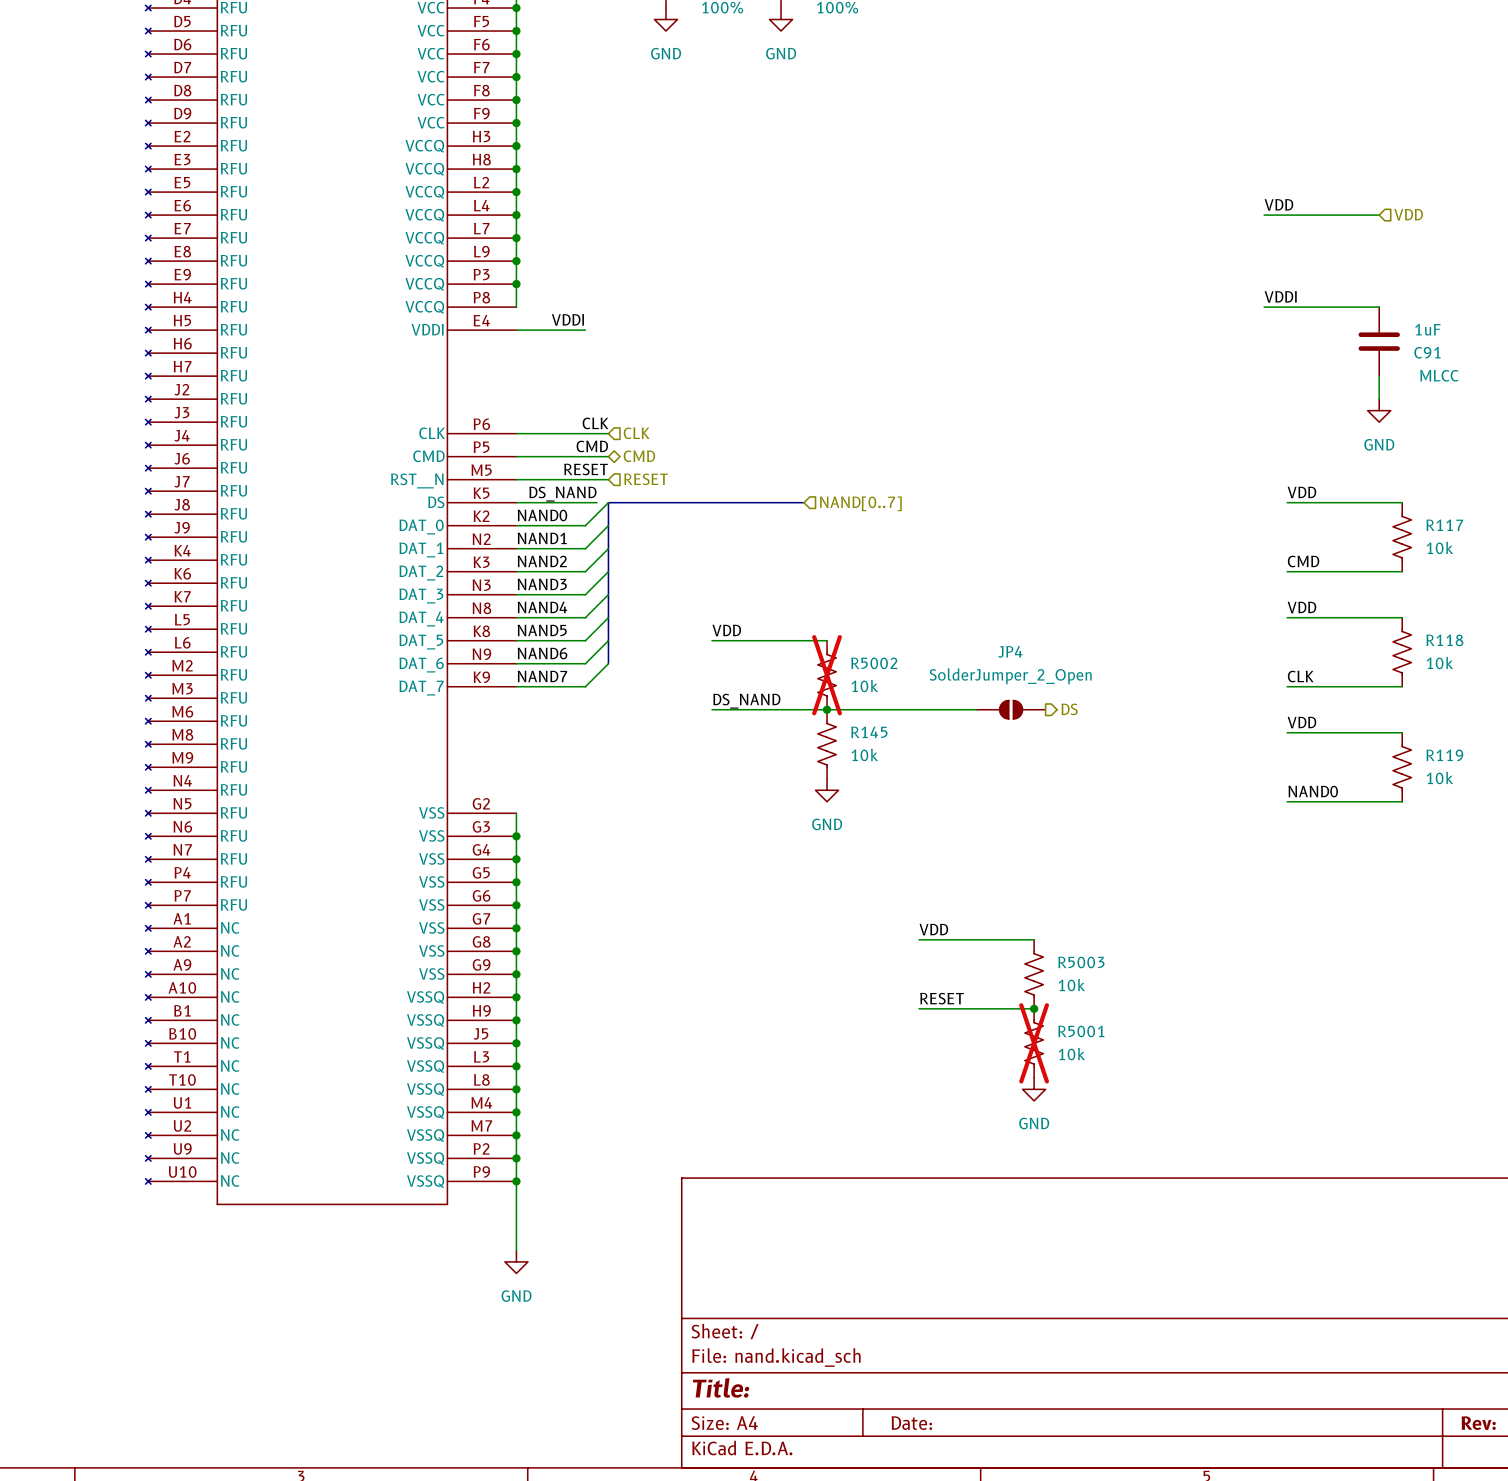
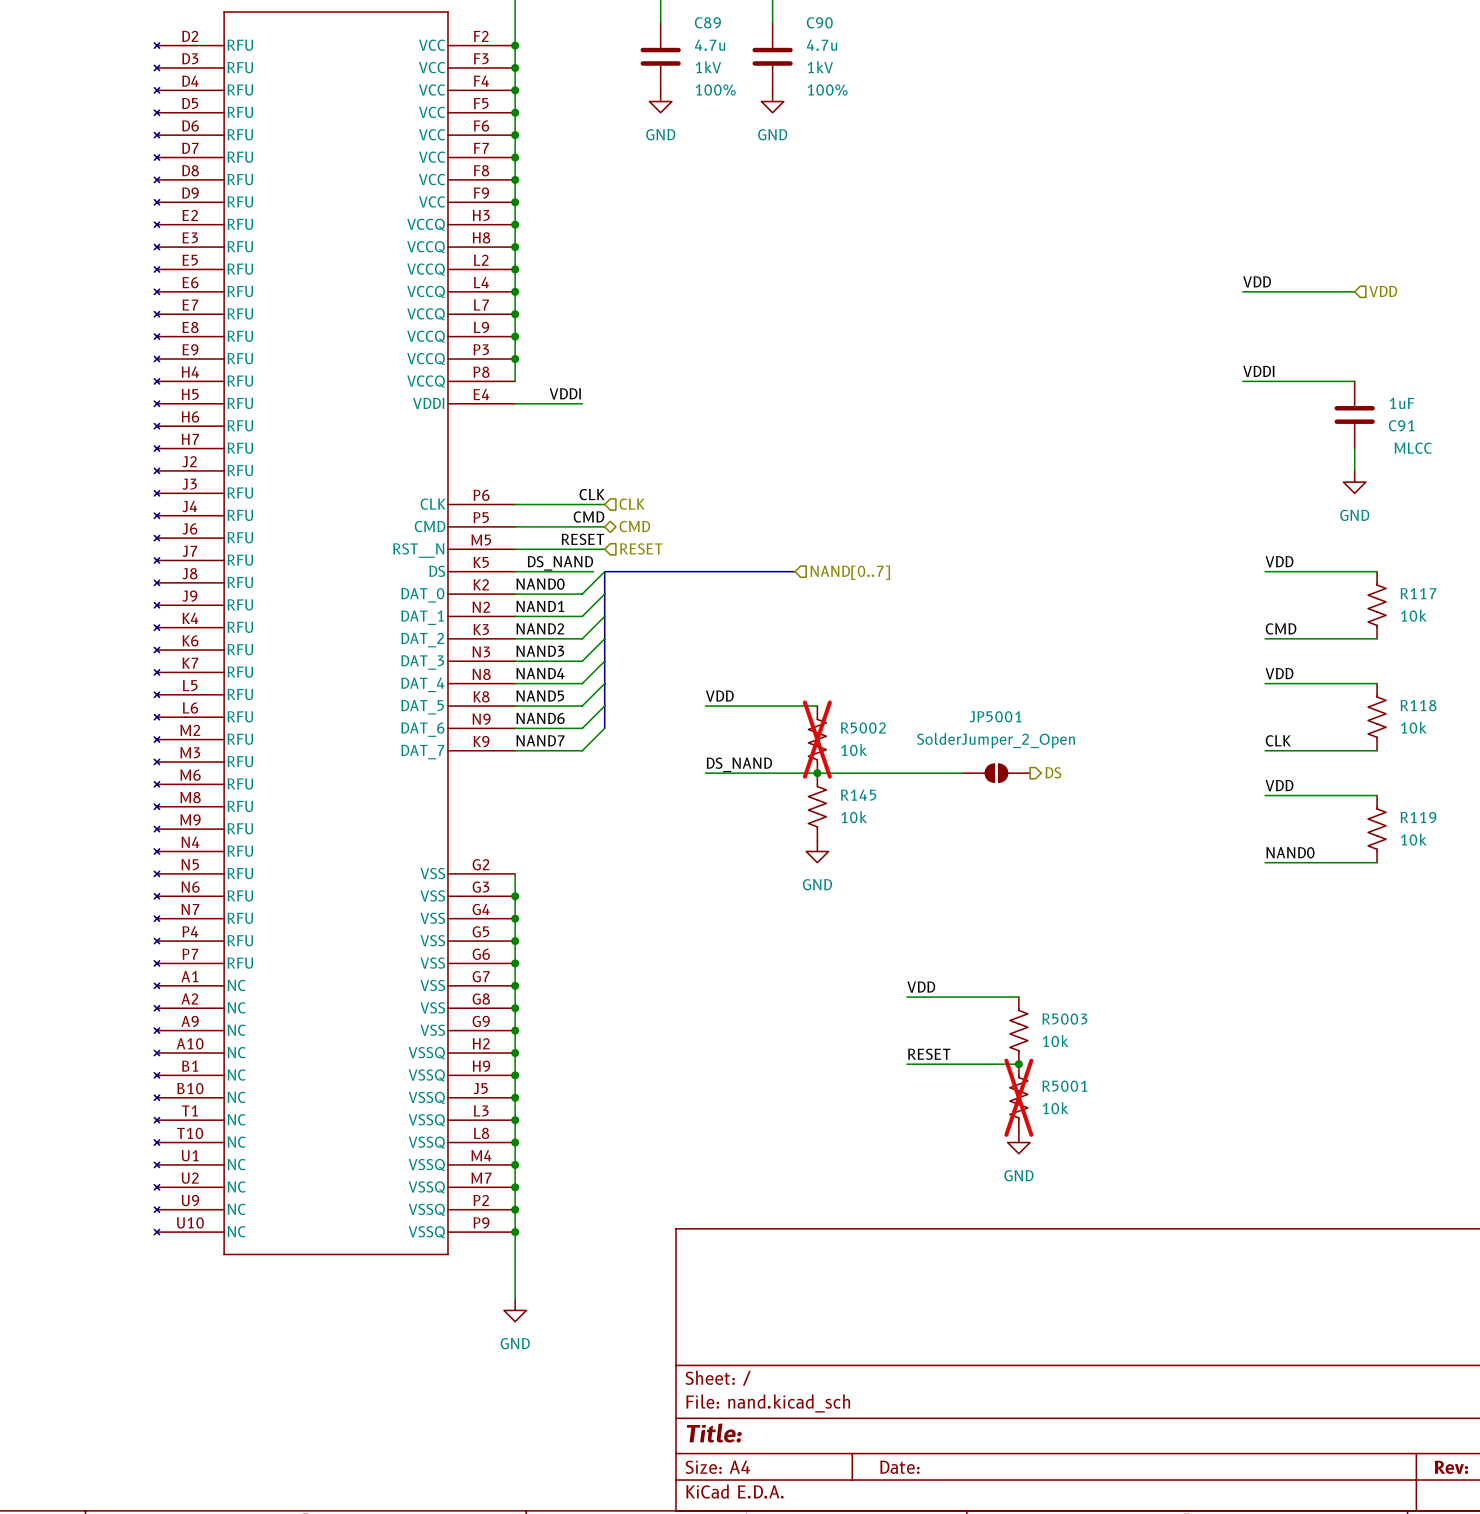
JP4 name: JP4 (1010, 651) -> JP5001 (995, 716)

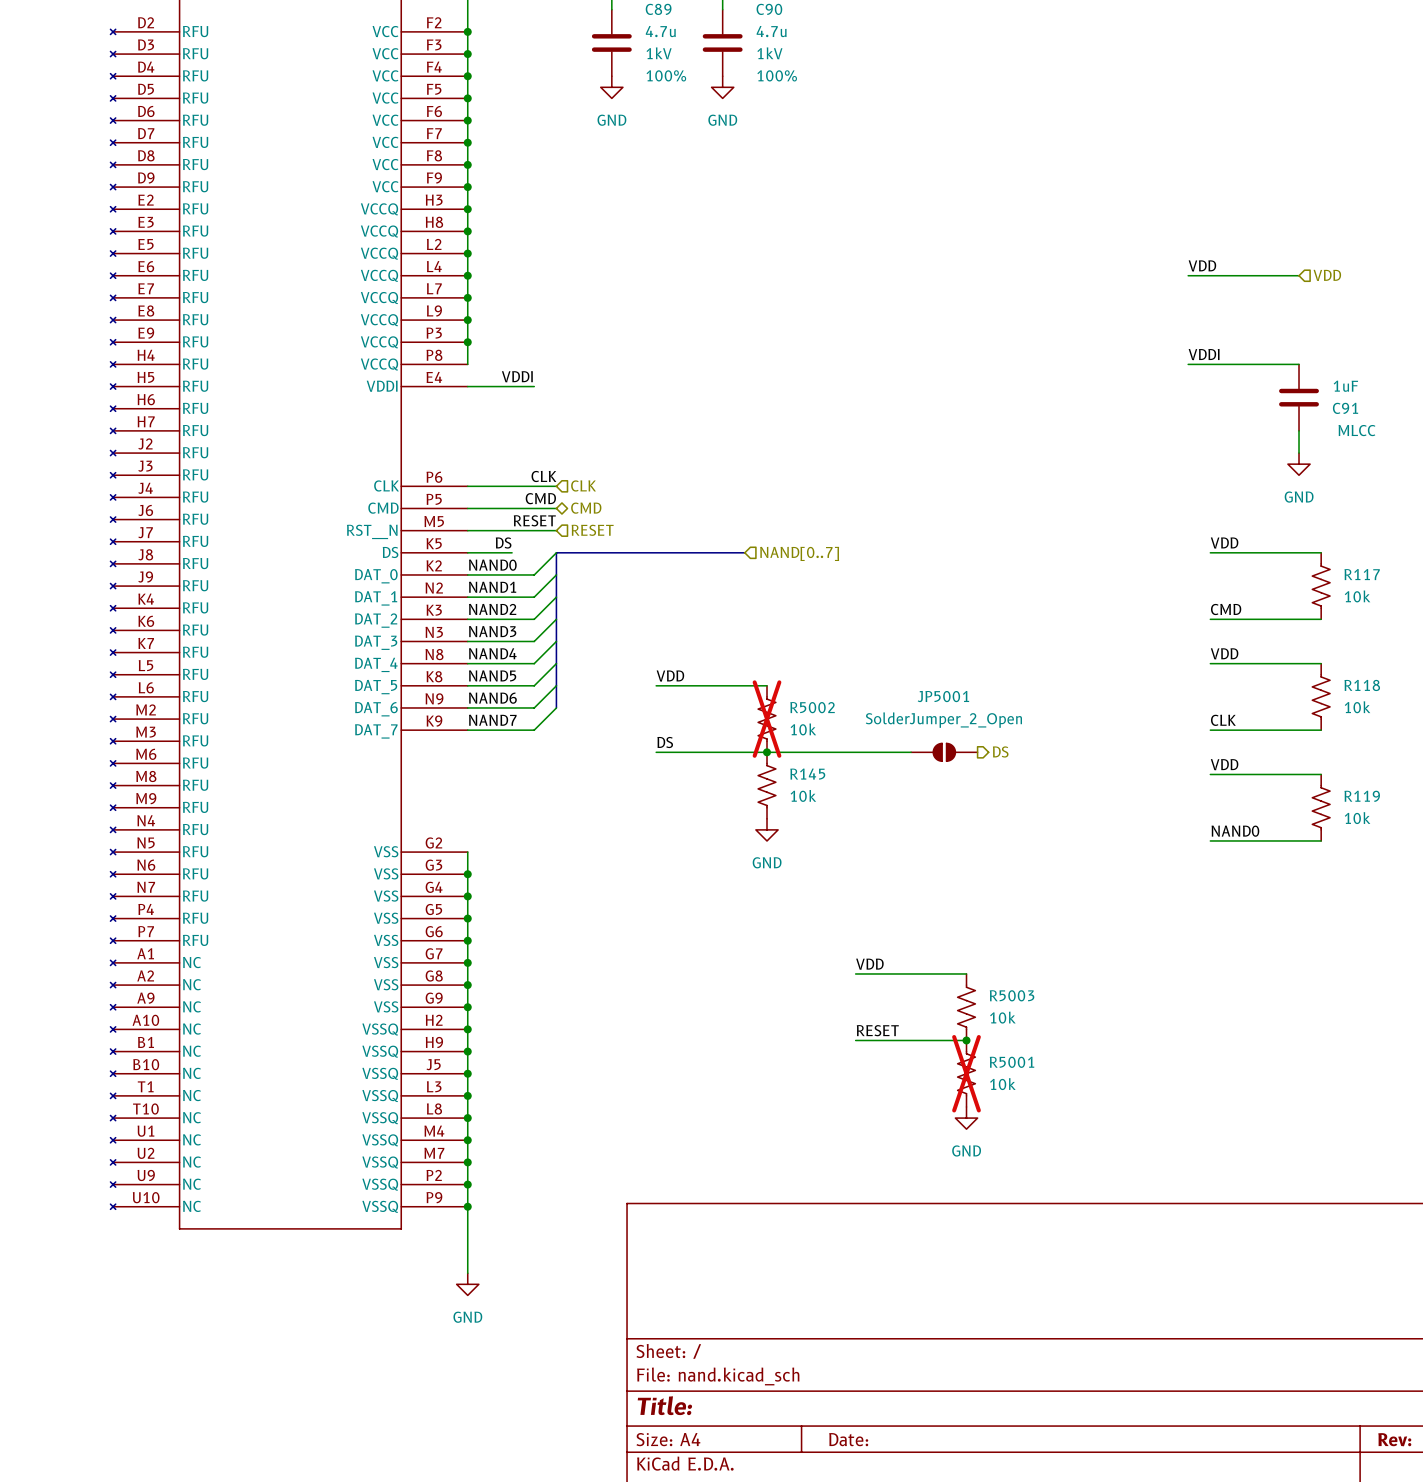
label: none -> DS (503, 543)
label: DS_NAND (560, 563) -> none
wire: (559, 571) (593, 571) -> none
label: DS_NAND (739, 764) -> DS (665, 742)

